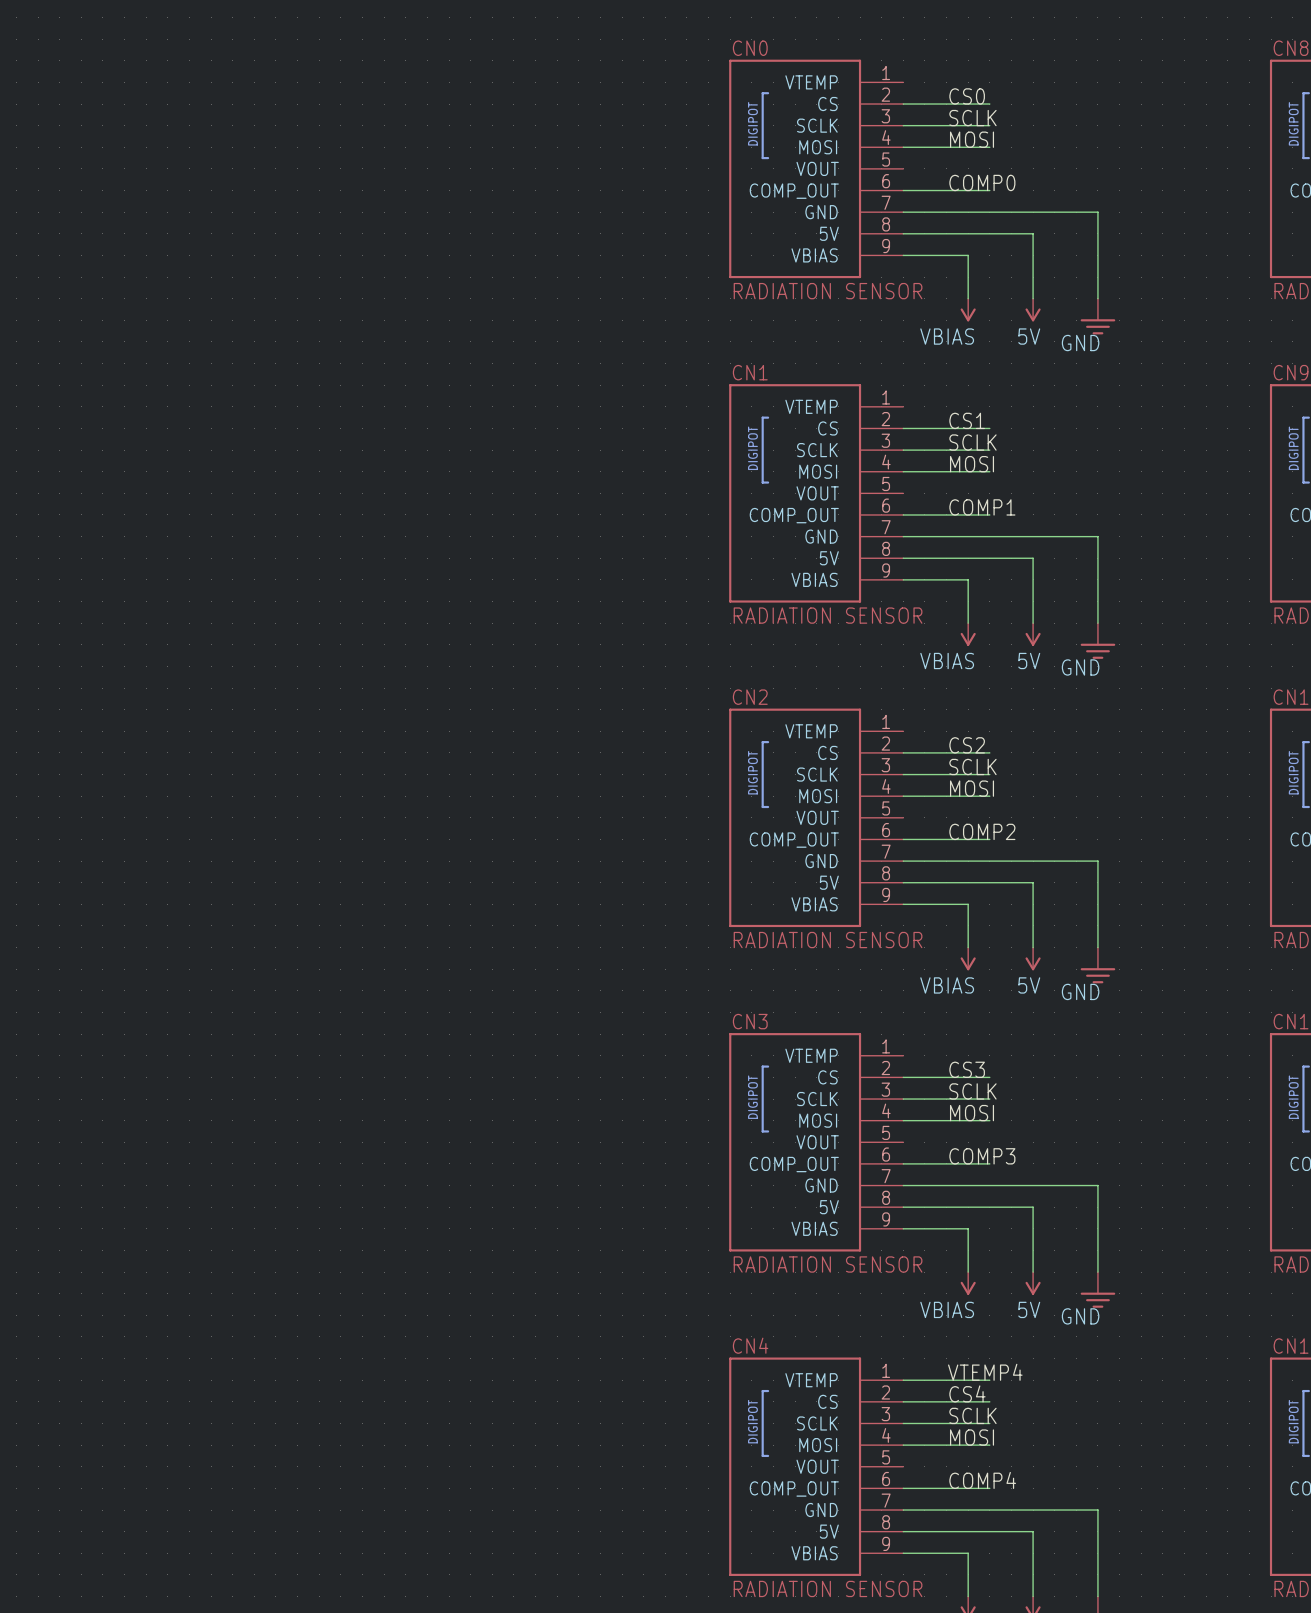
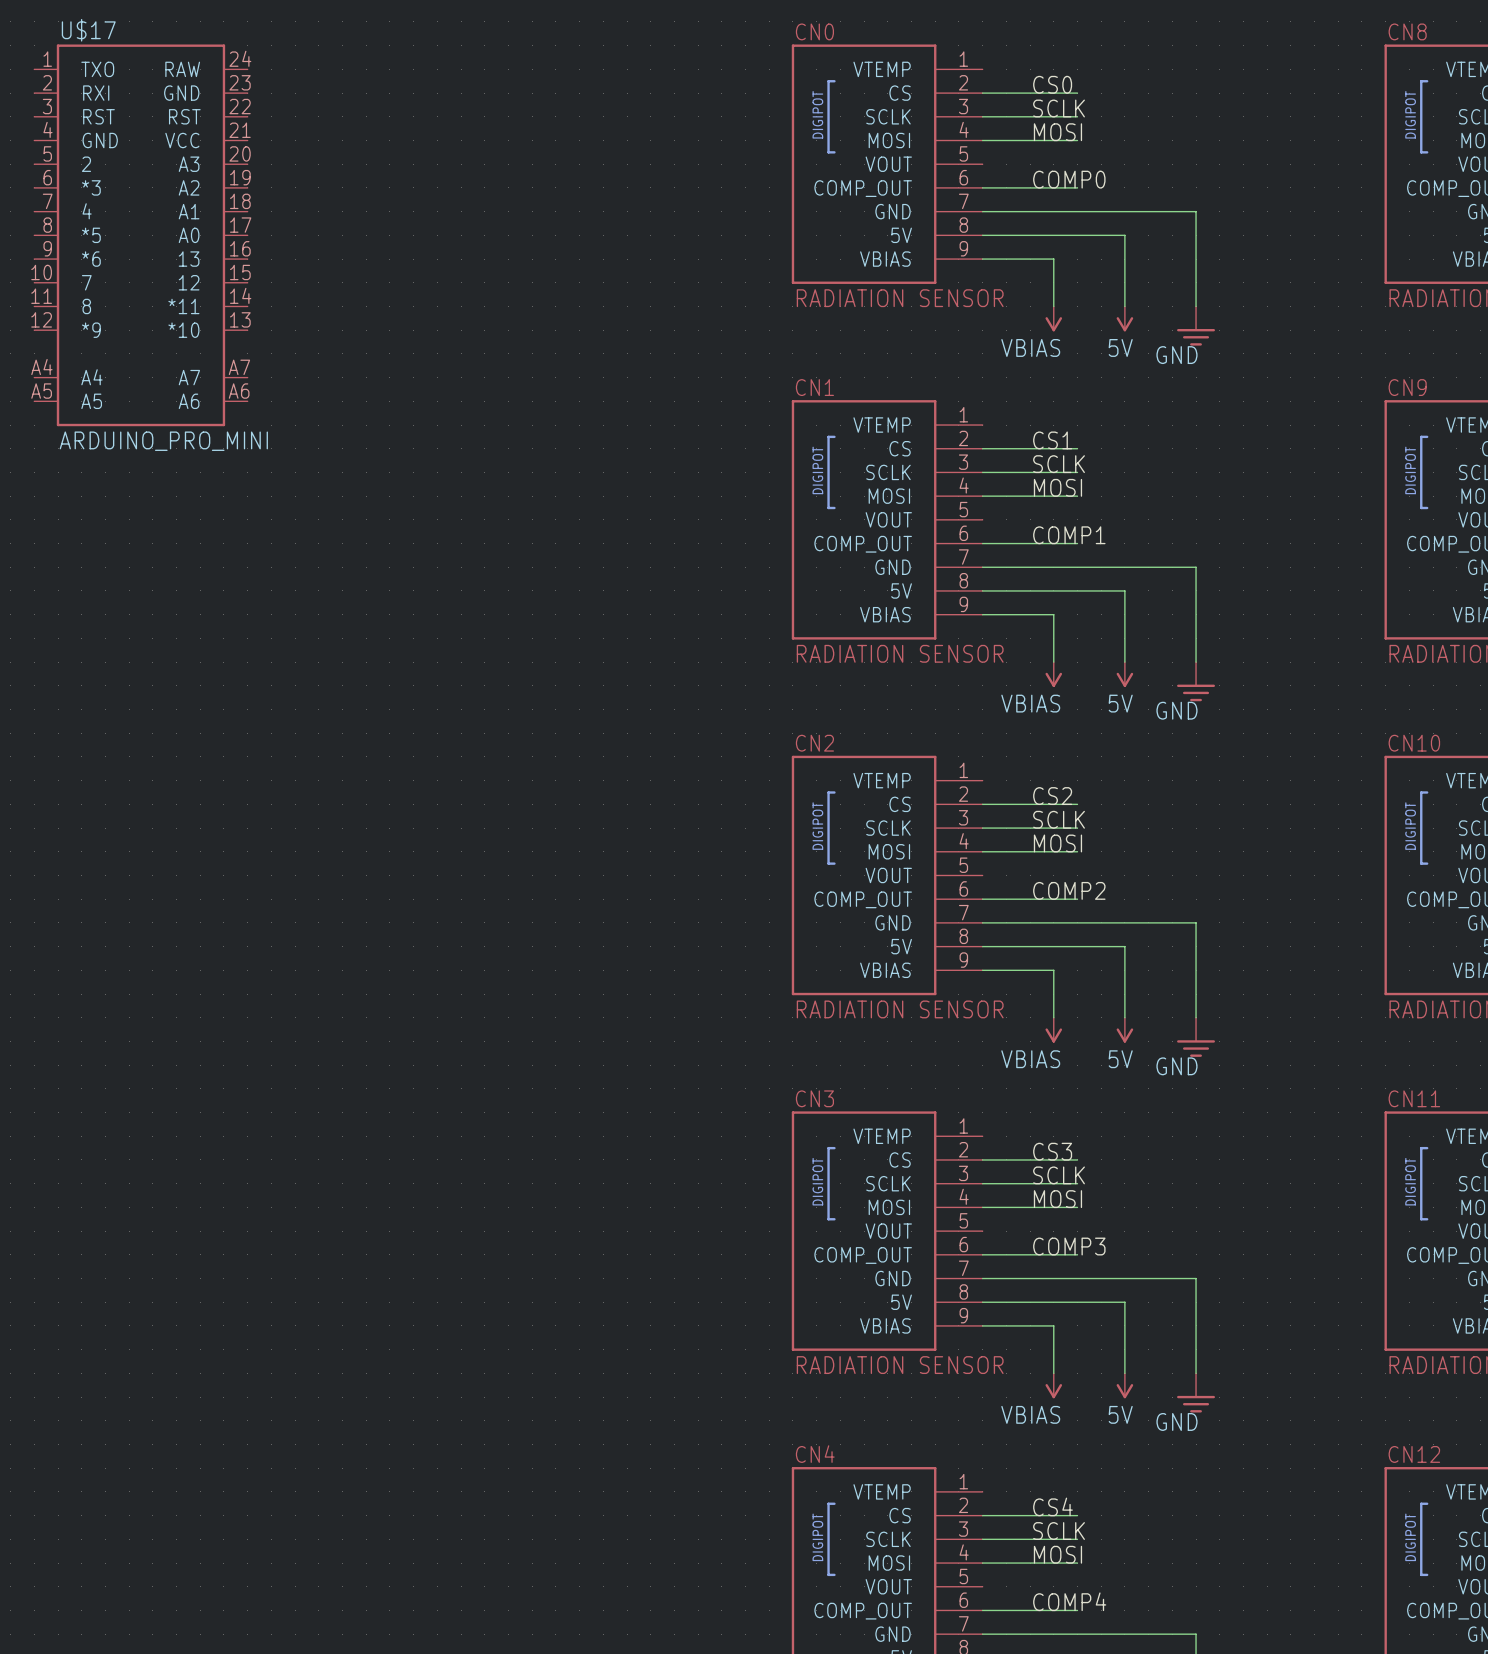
U$17: none -> ARDUINO_PRO_MINI (140, 235)
label: VTEMP4 (985, 1372) -> none
wire: (903, 1380) (989, 1380) -> none

